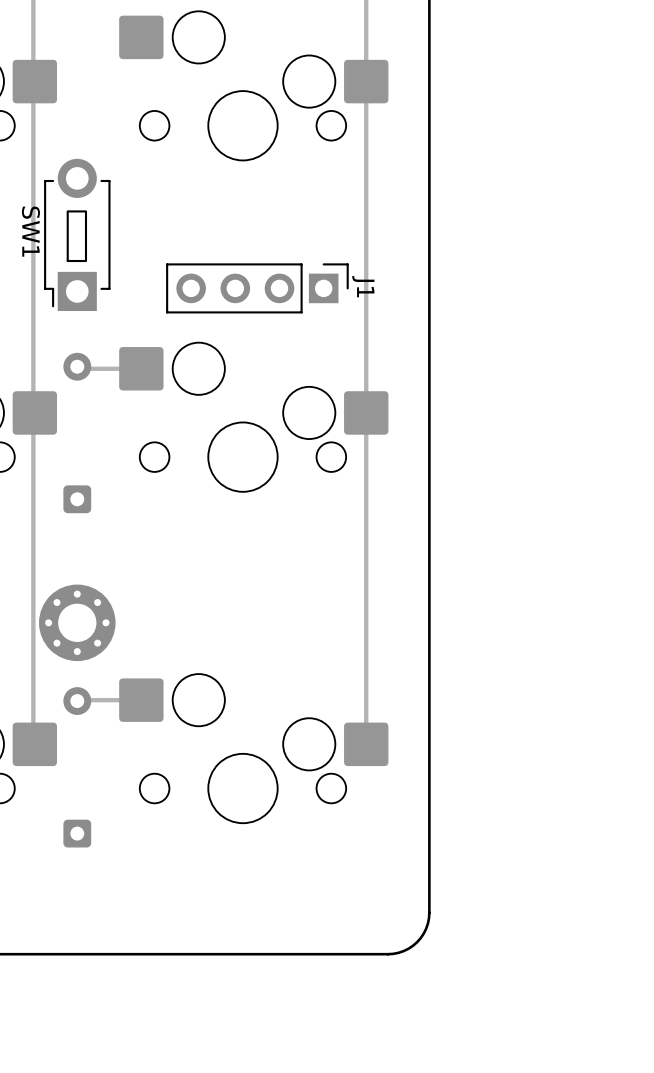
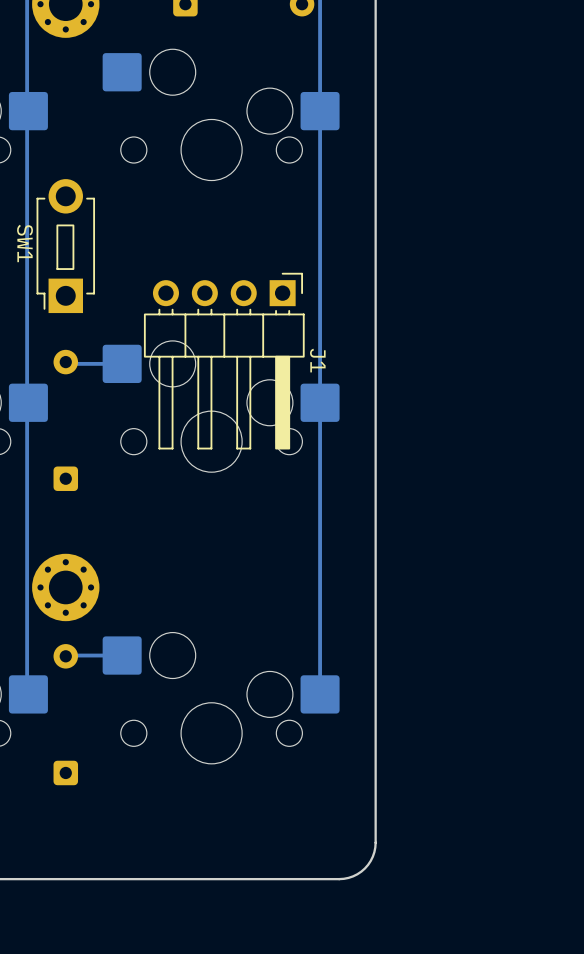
J1 footprint: [166, 263, 349, 314] -> [143, 272, 305, 450]

